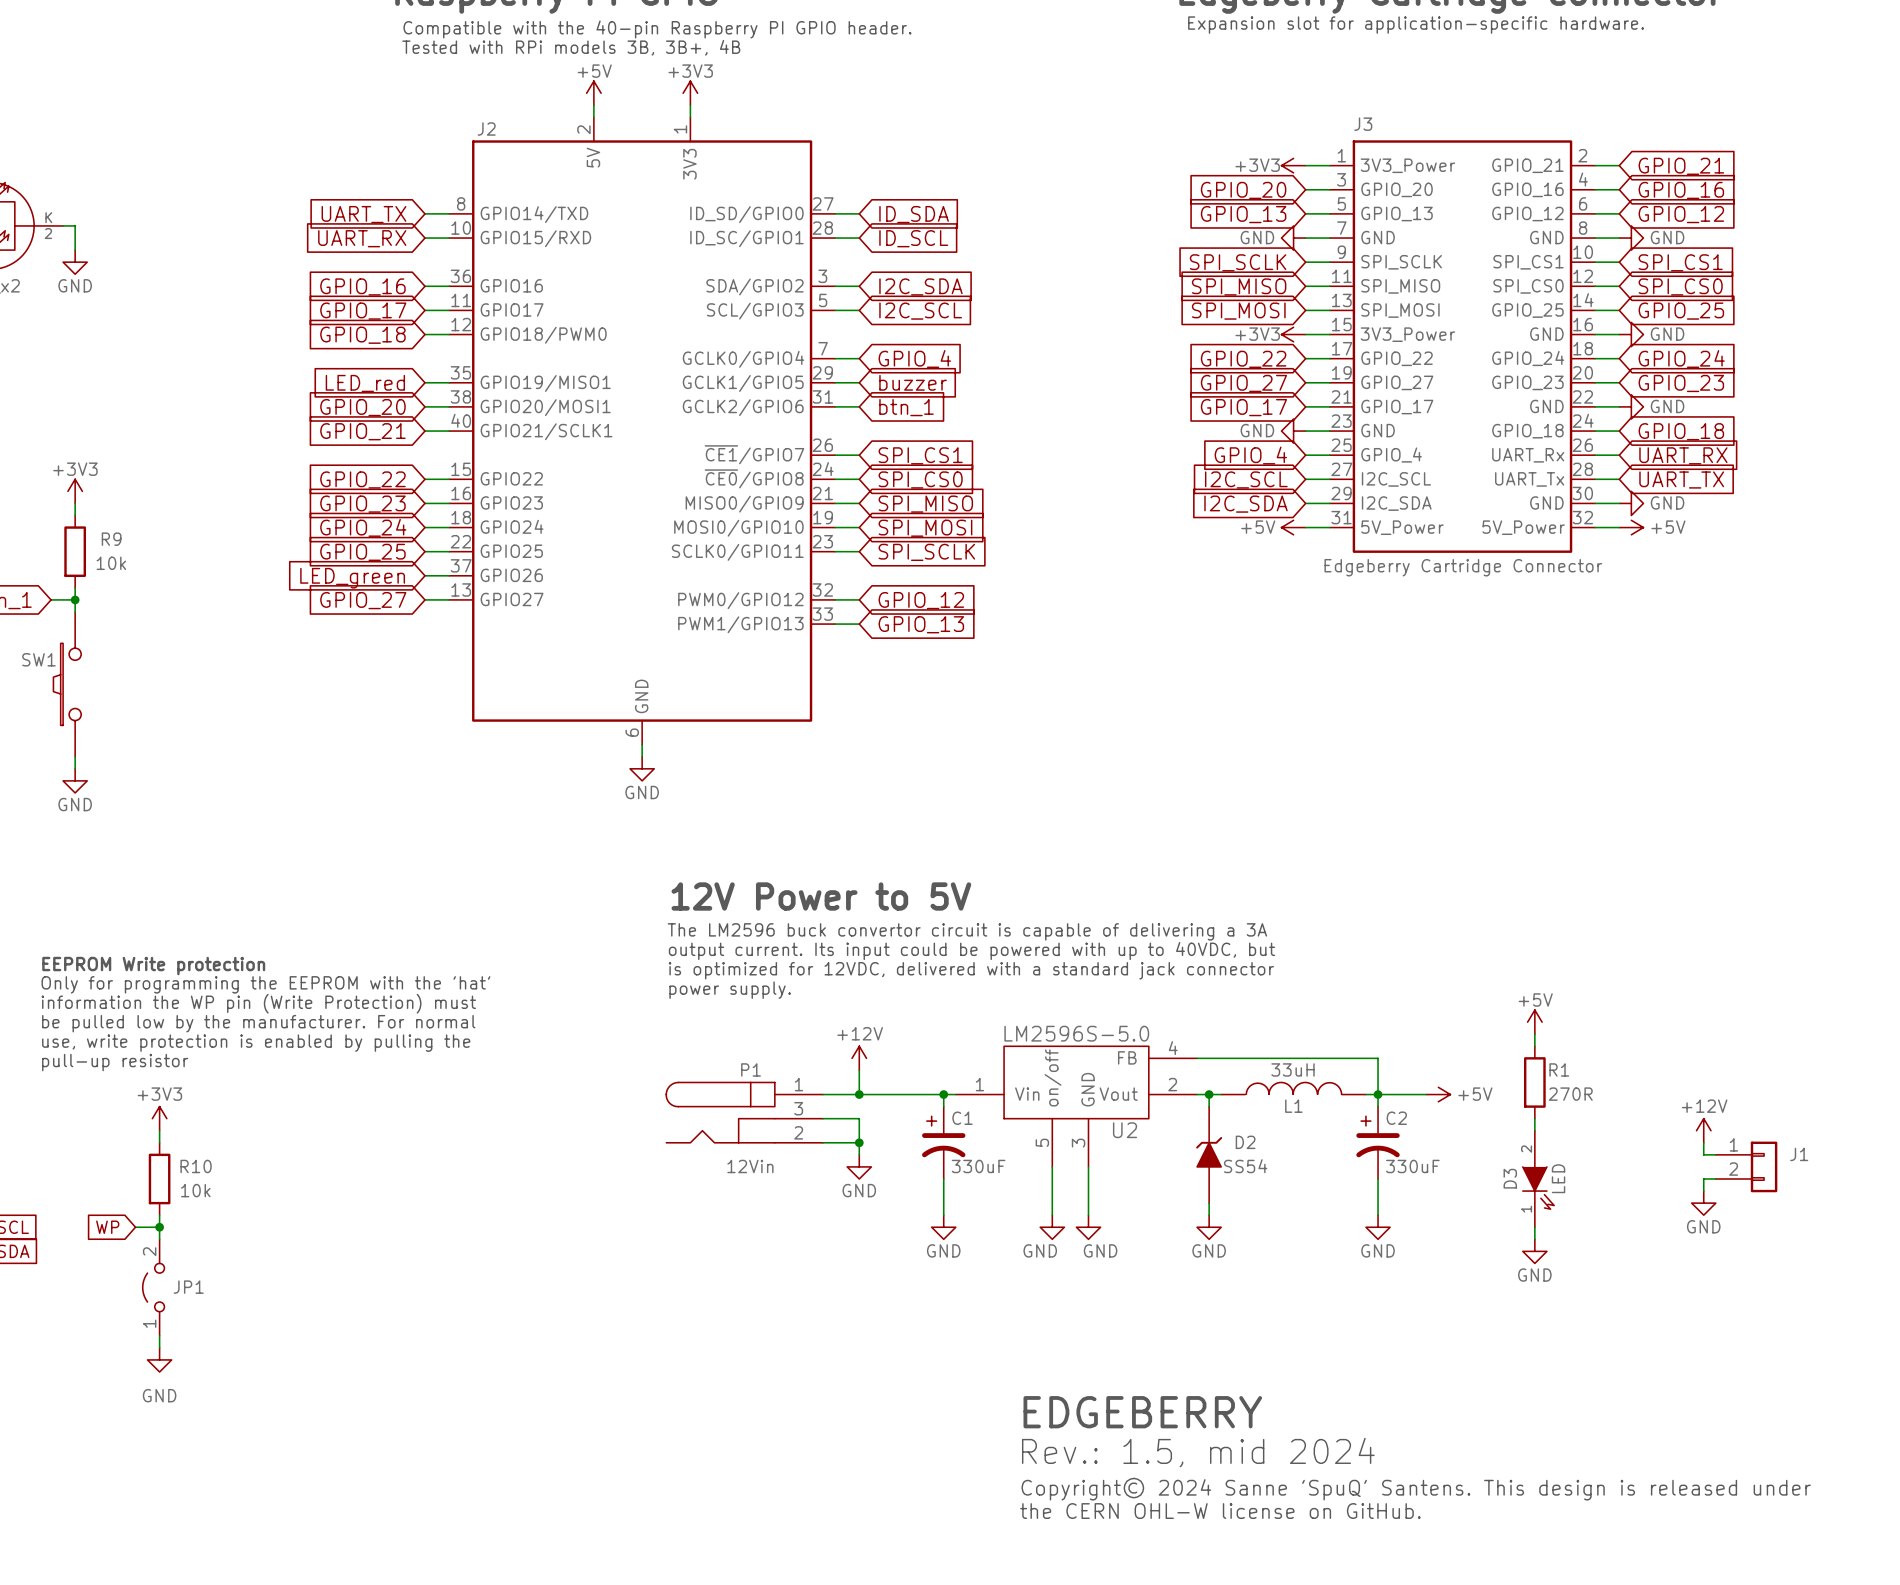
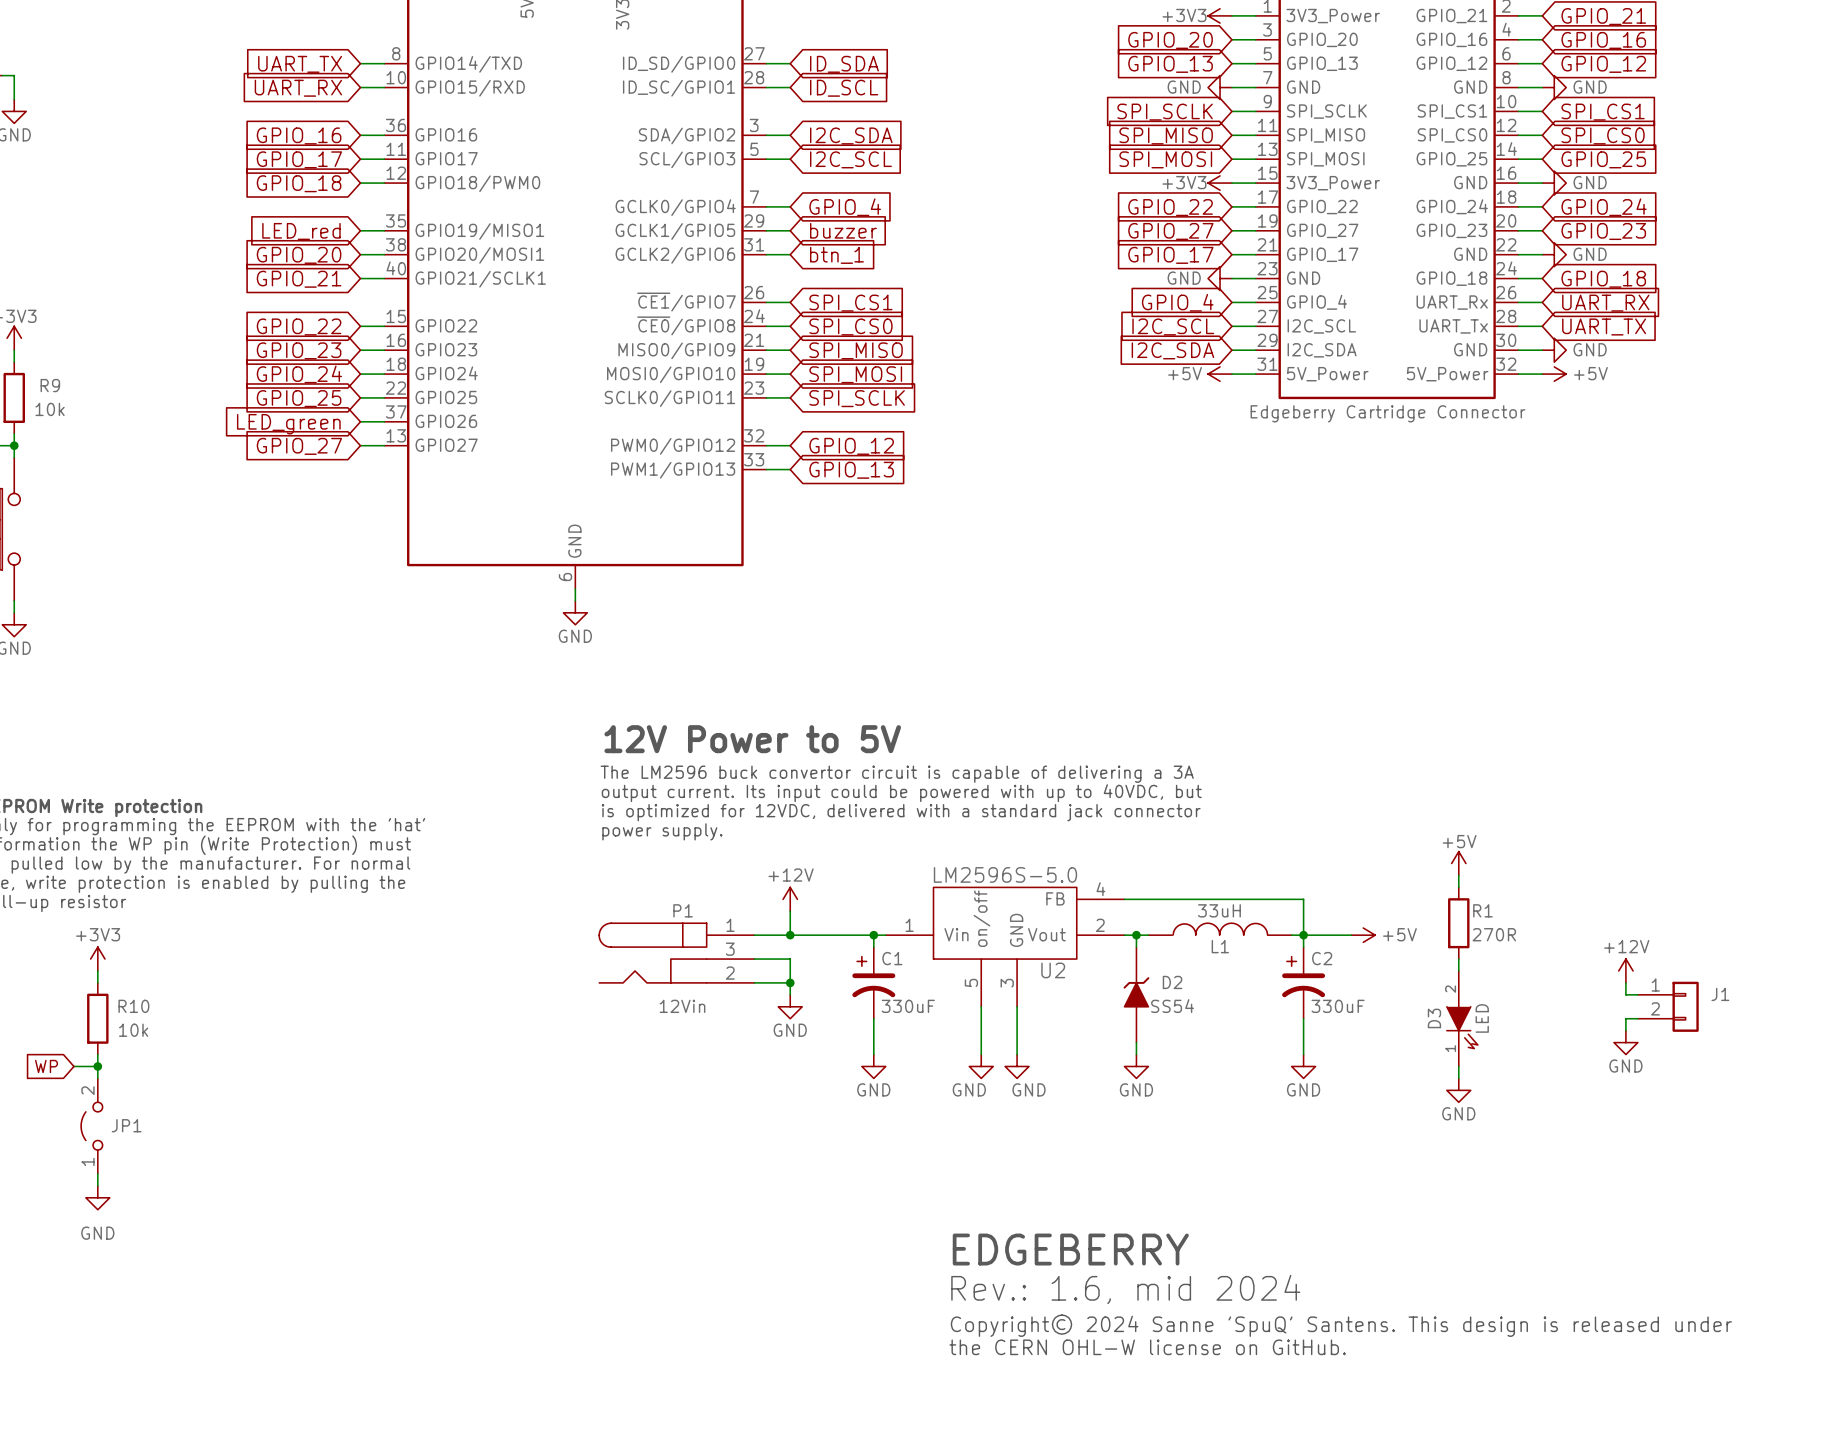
text: Rev.: 1.5, mid 2024 (1198, 1452) -> Rev.: 1.6, mid 2024 (1125, 1289)

